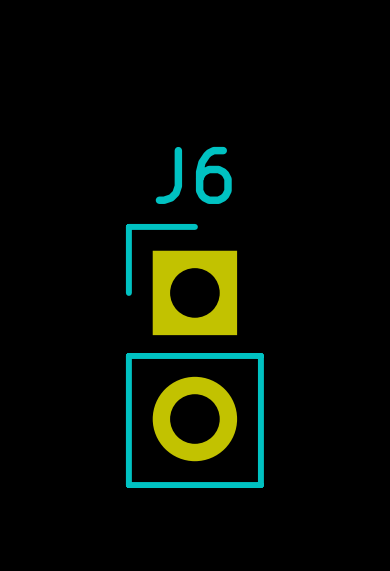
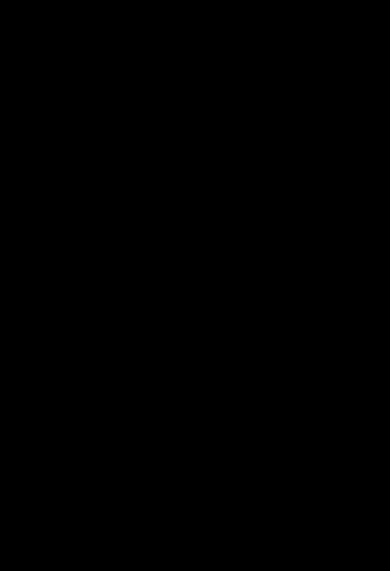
J6: (194, 355) -> none

